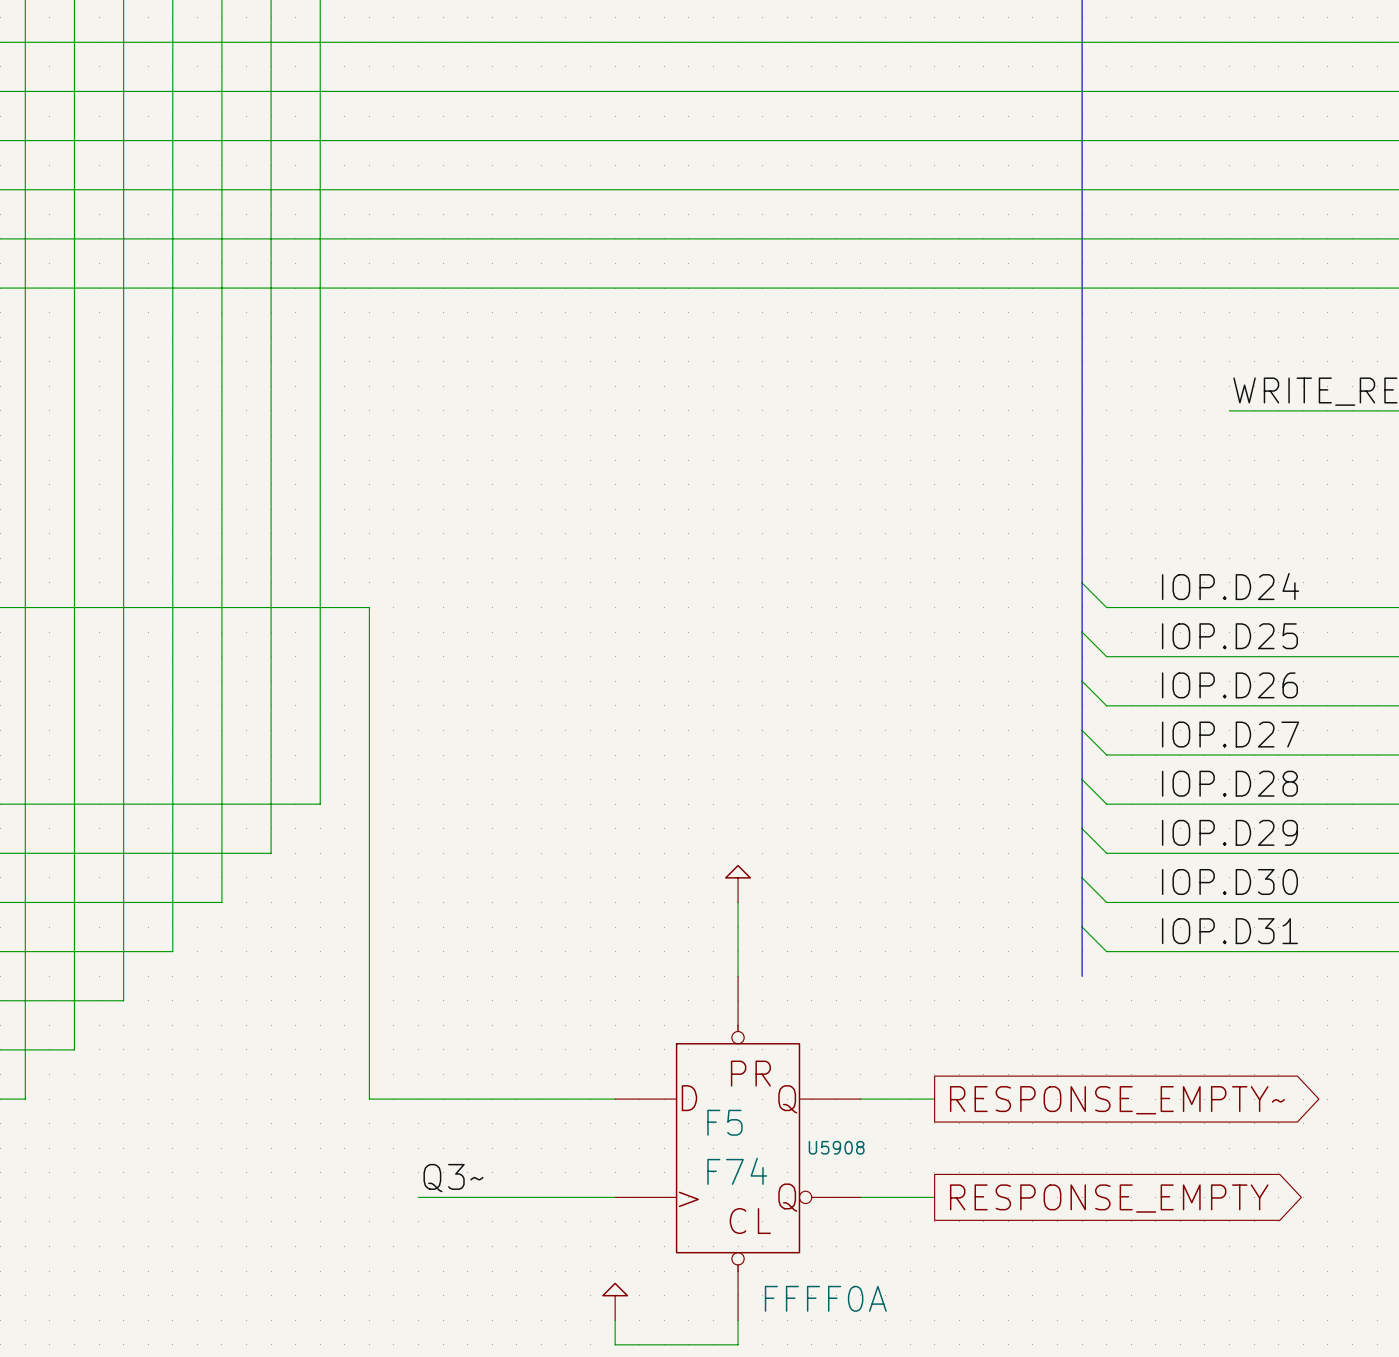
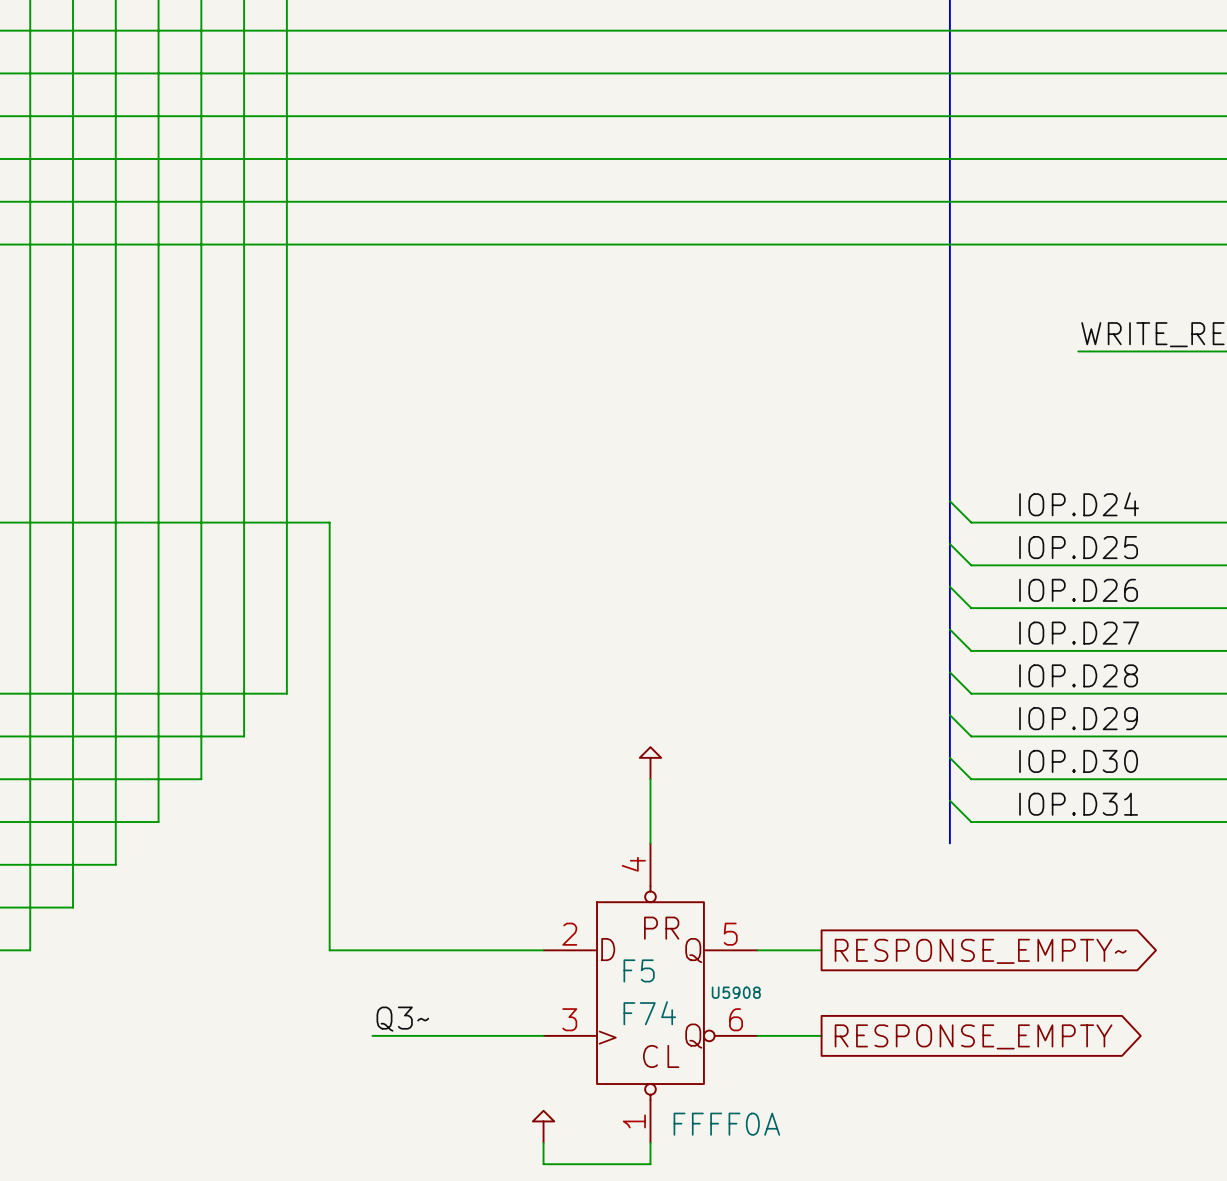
U5908 pin number: none -> 4 (633, 864)
U5908 pin number: none -> 2 (569, 934)
U5908 pin number: none -> 5 (730, 934)
U5908 pin number: none -> 3 (569, 1019)
U5908 pin number: none -> 6 (736, 1019)
U5908 pin number: none -> 1 (634, 1121)

